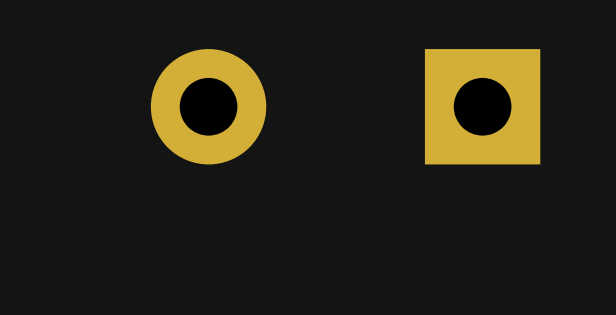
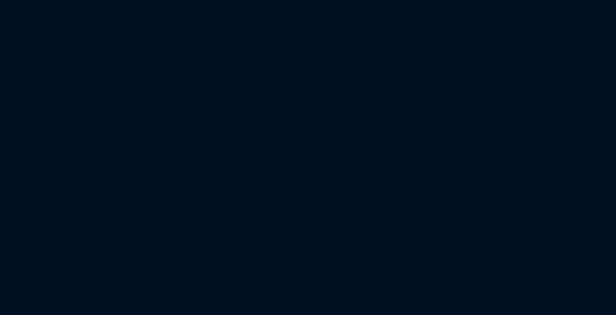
part: (345, 106) -> none

